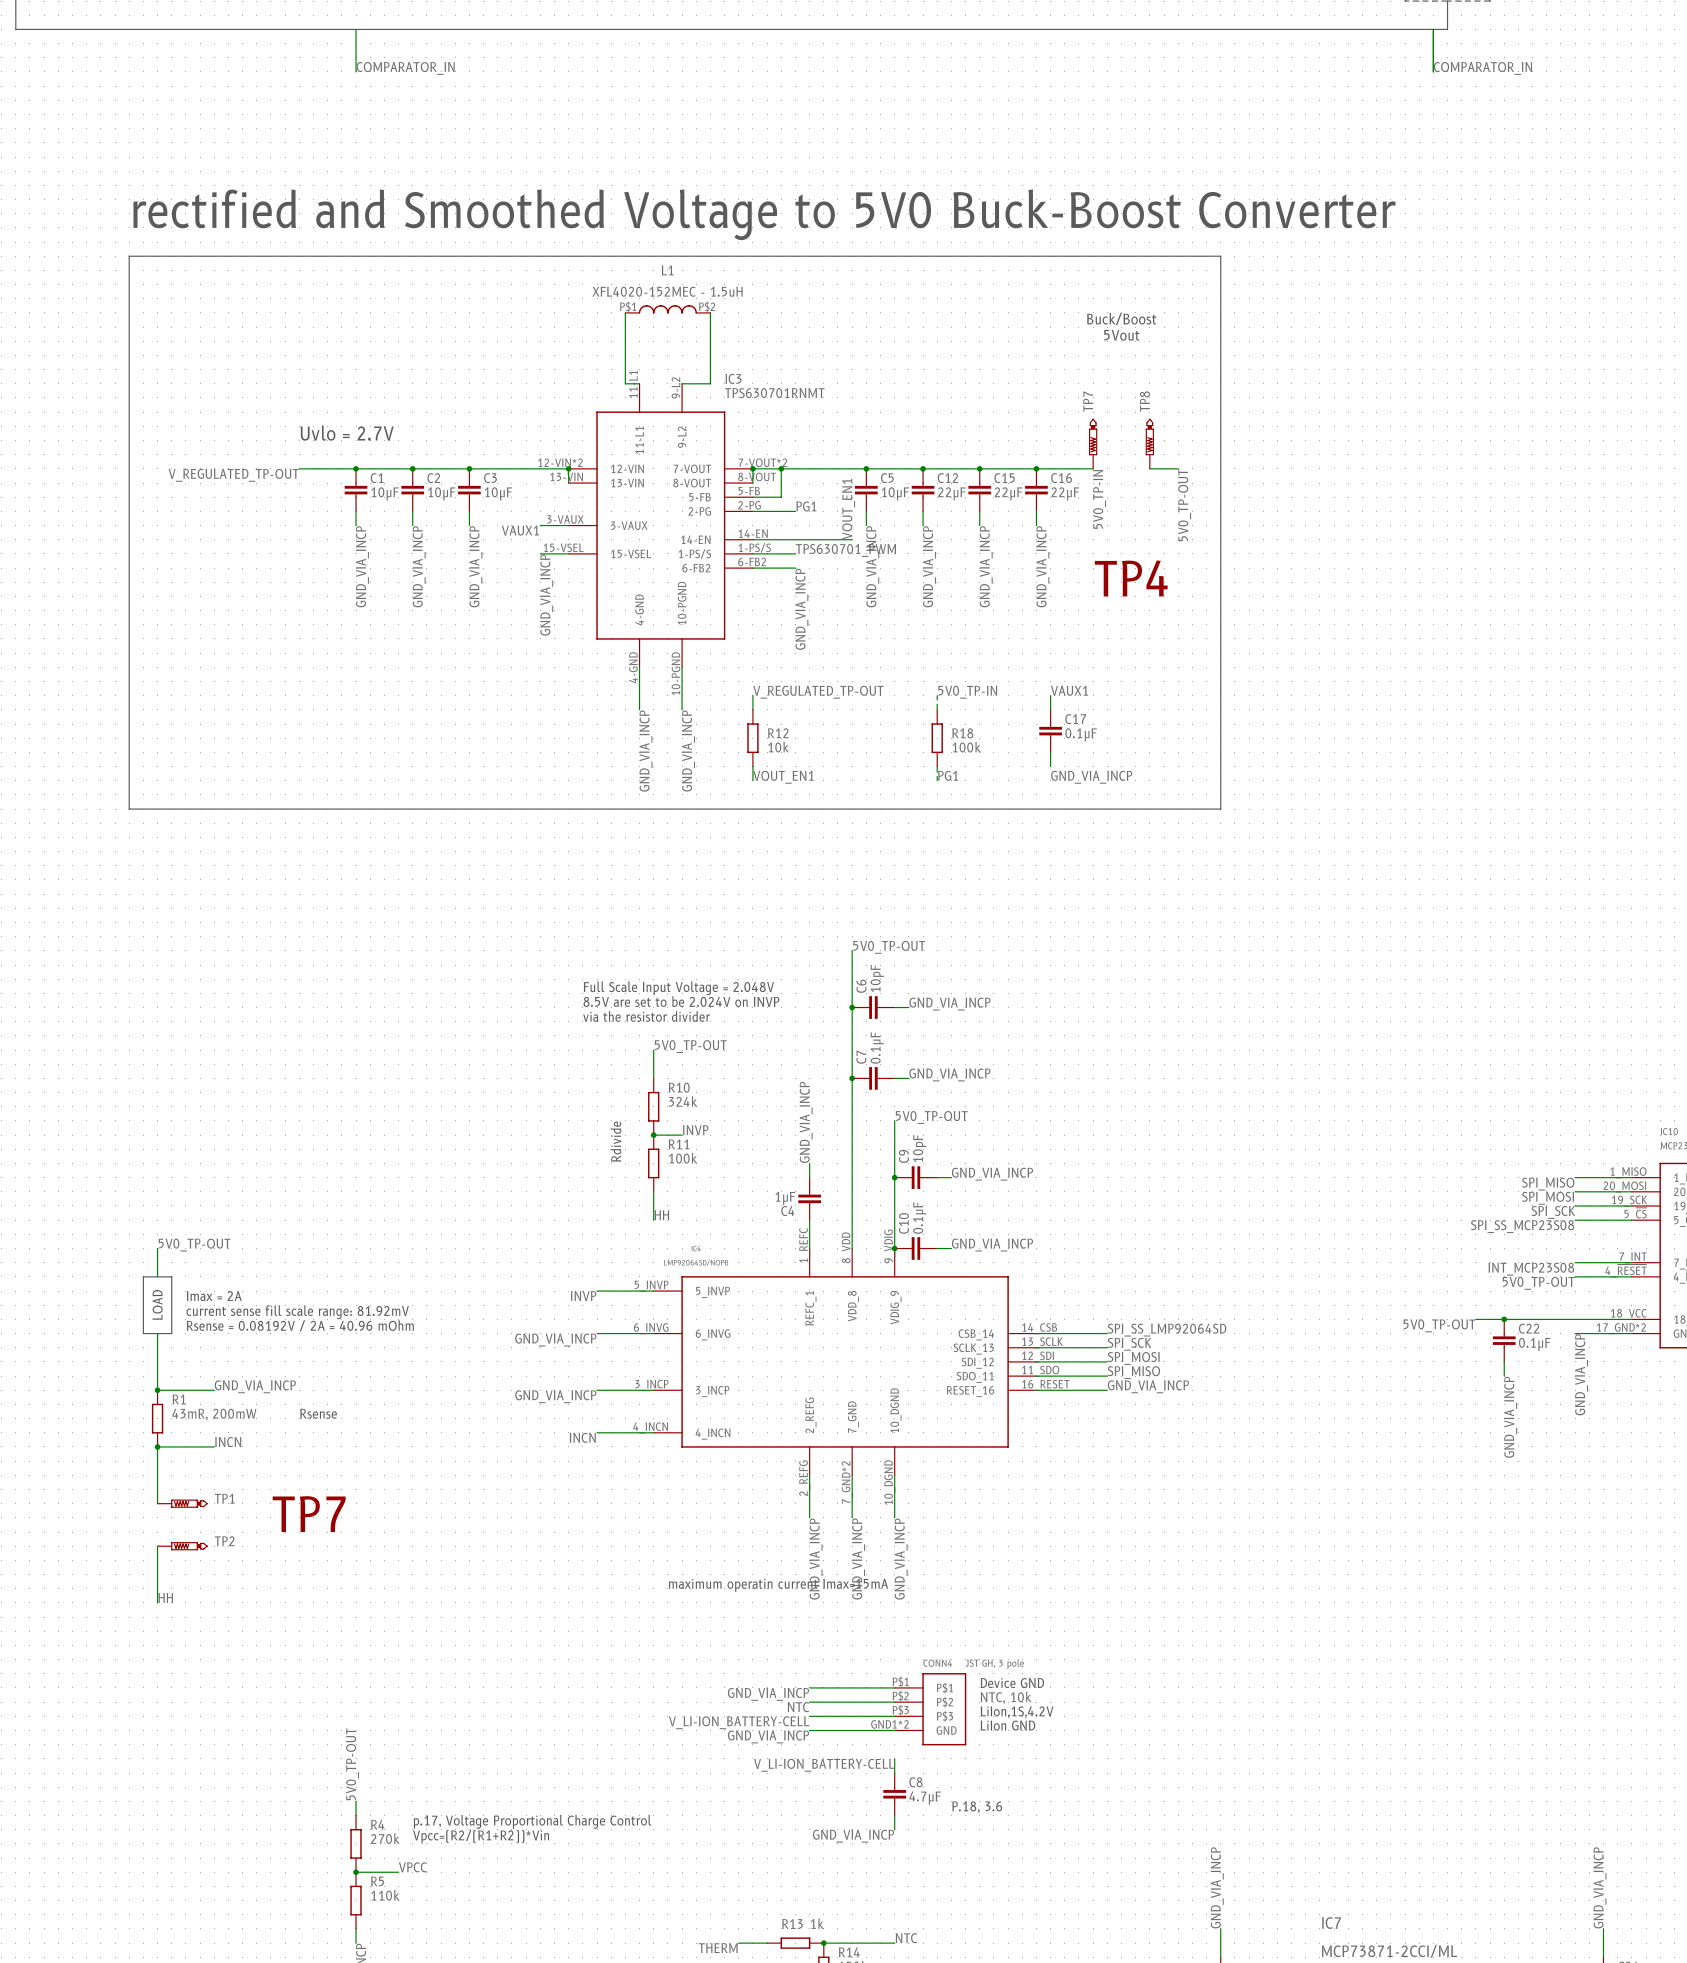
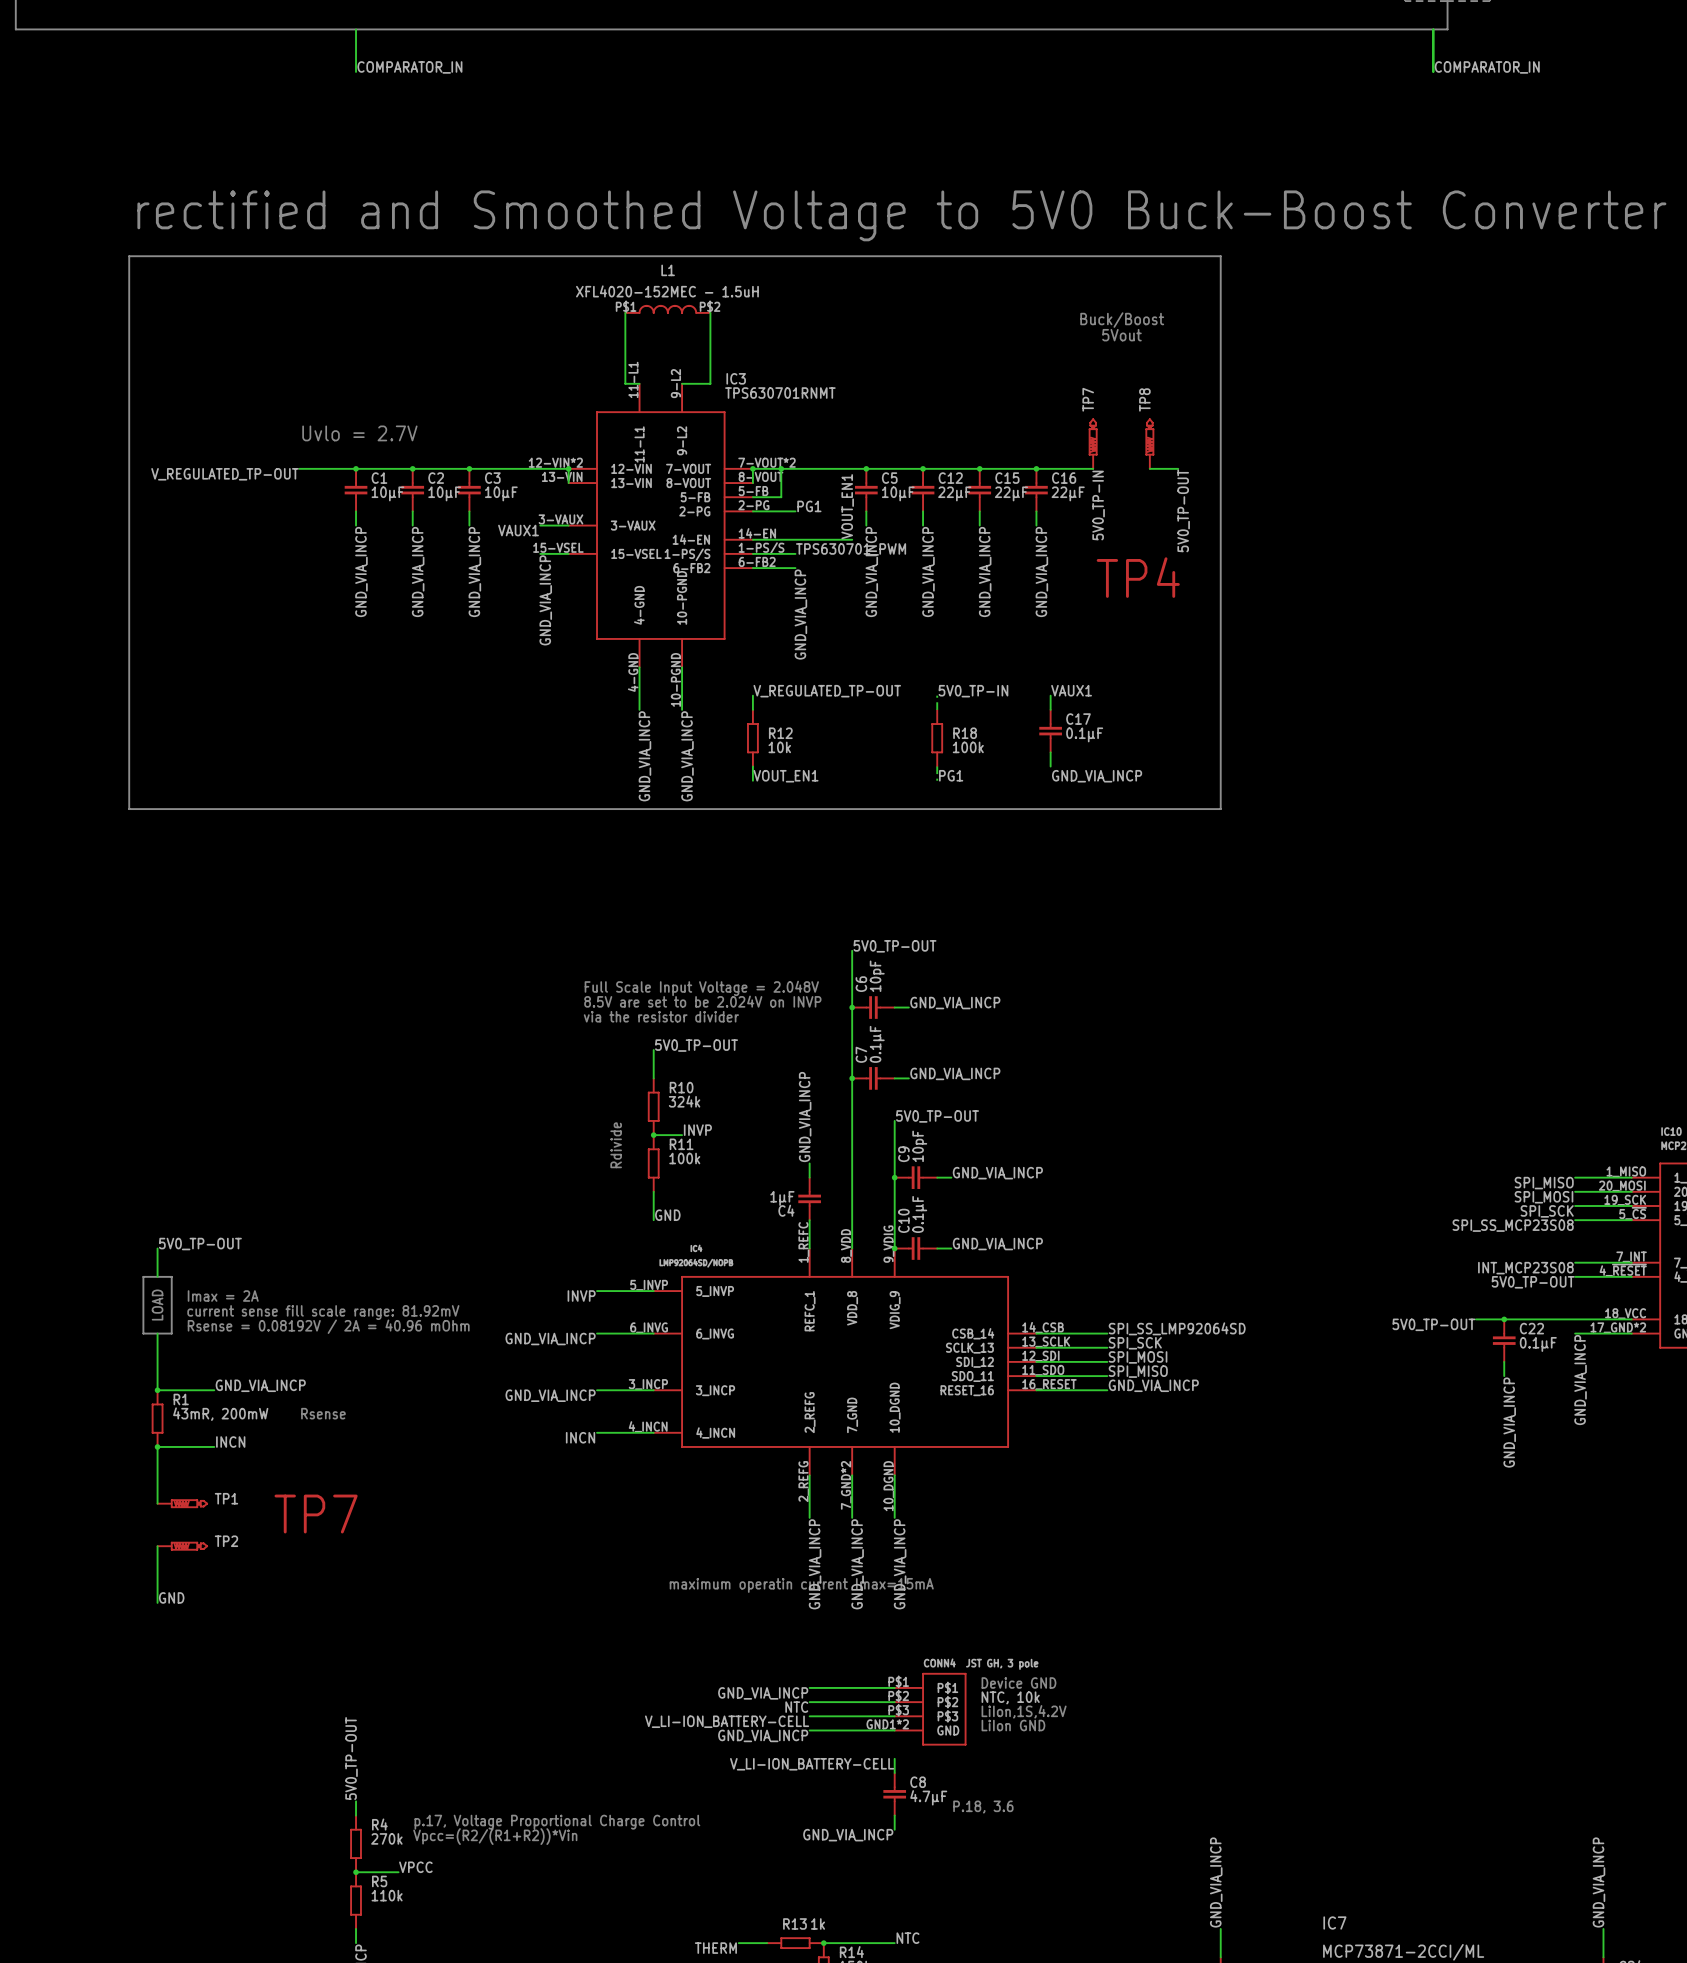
label: HH (661, 1215) -> GND (667, 1215)
label: HH (165, 1597) -> GND (171, 1597)

